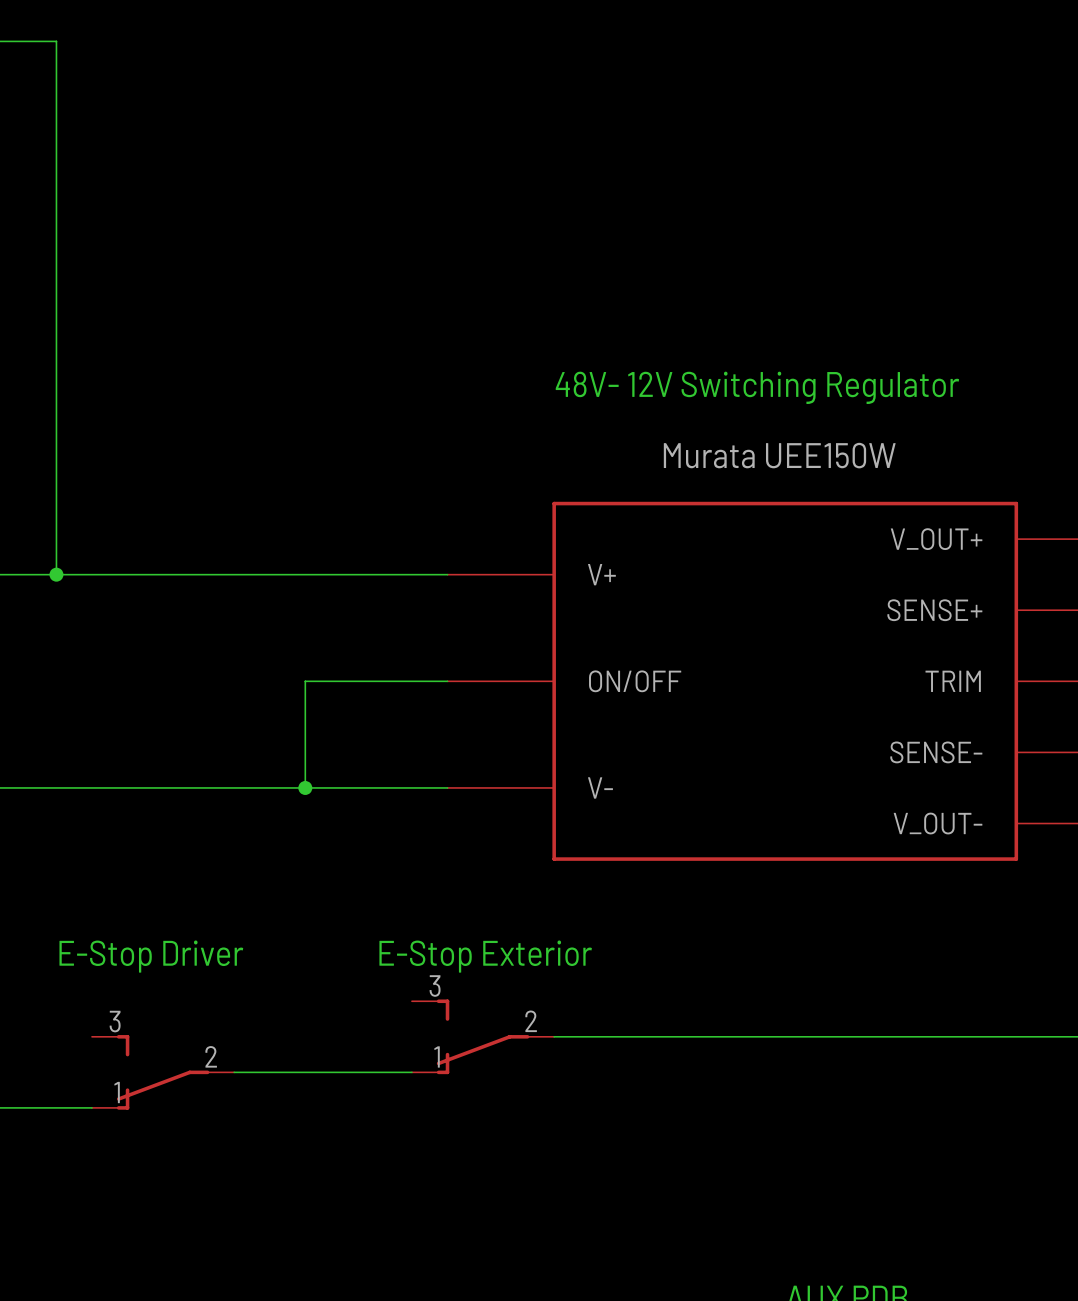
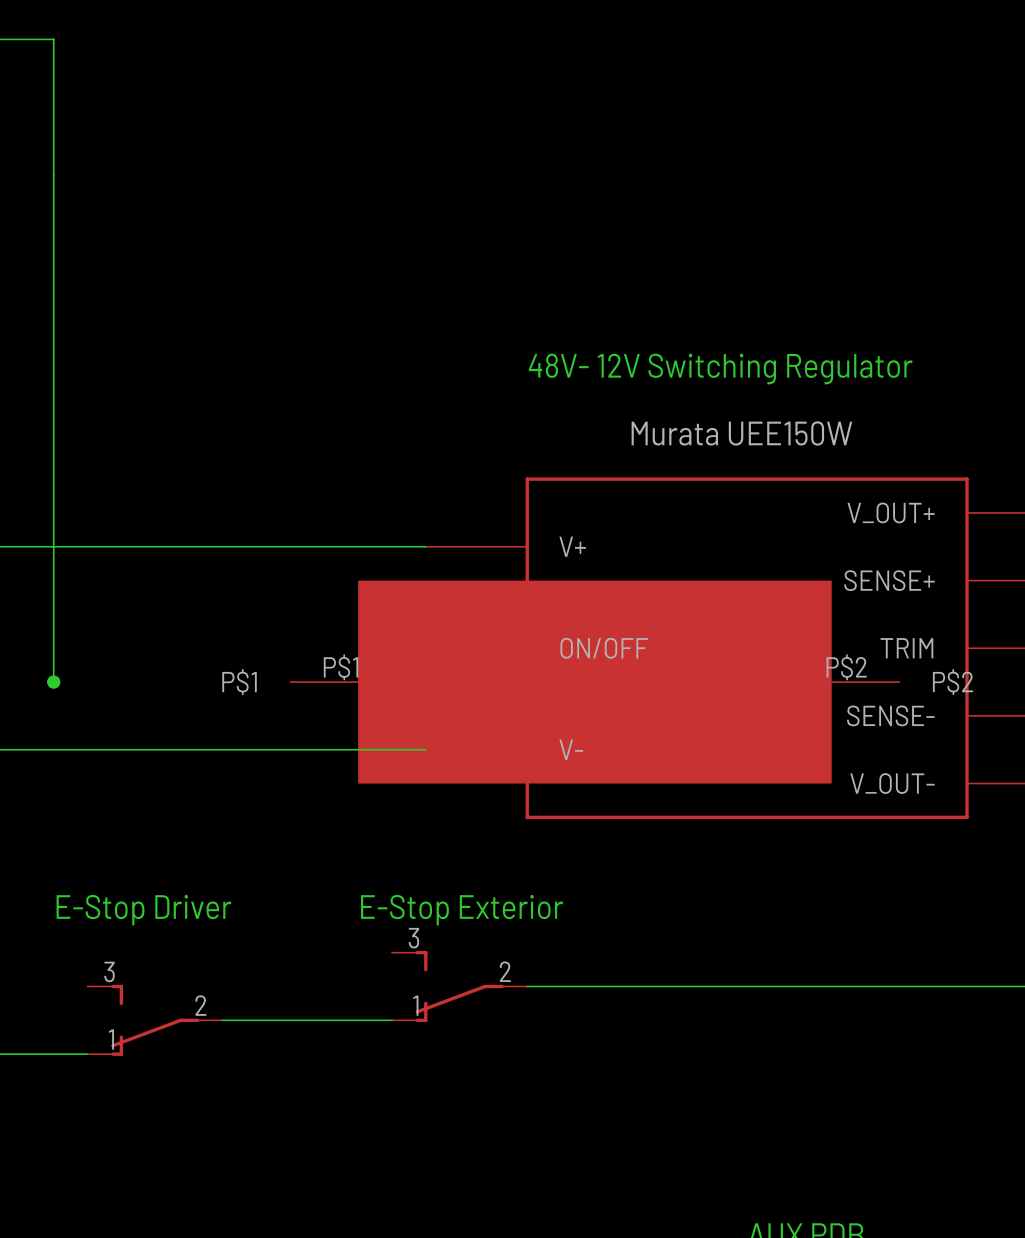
wire: none -> (53, 546) (53, 682)
junction: (56, 574) -> none
wire: (447, 681) (305, 681) (305, 787) -> none
junction: none -> (53, 682)
part: none -> (594, 682)
junction: (305, 787) -> none

